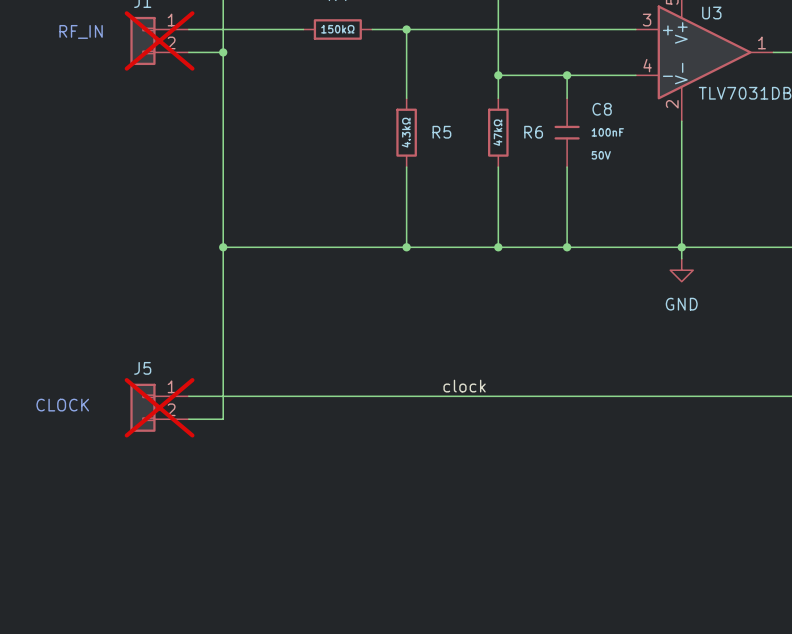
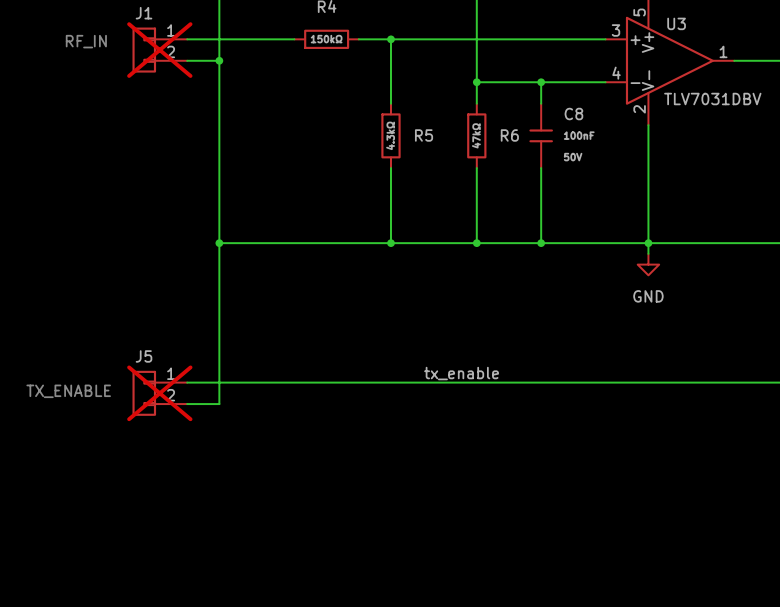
label: clock (464, 386) -> tx_enable (461, 373)
text: CLOCK (62, 405) -> TX_ENABLE (68, 391)

